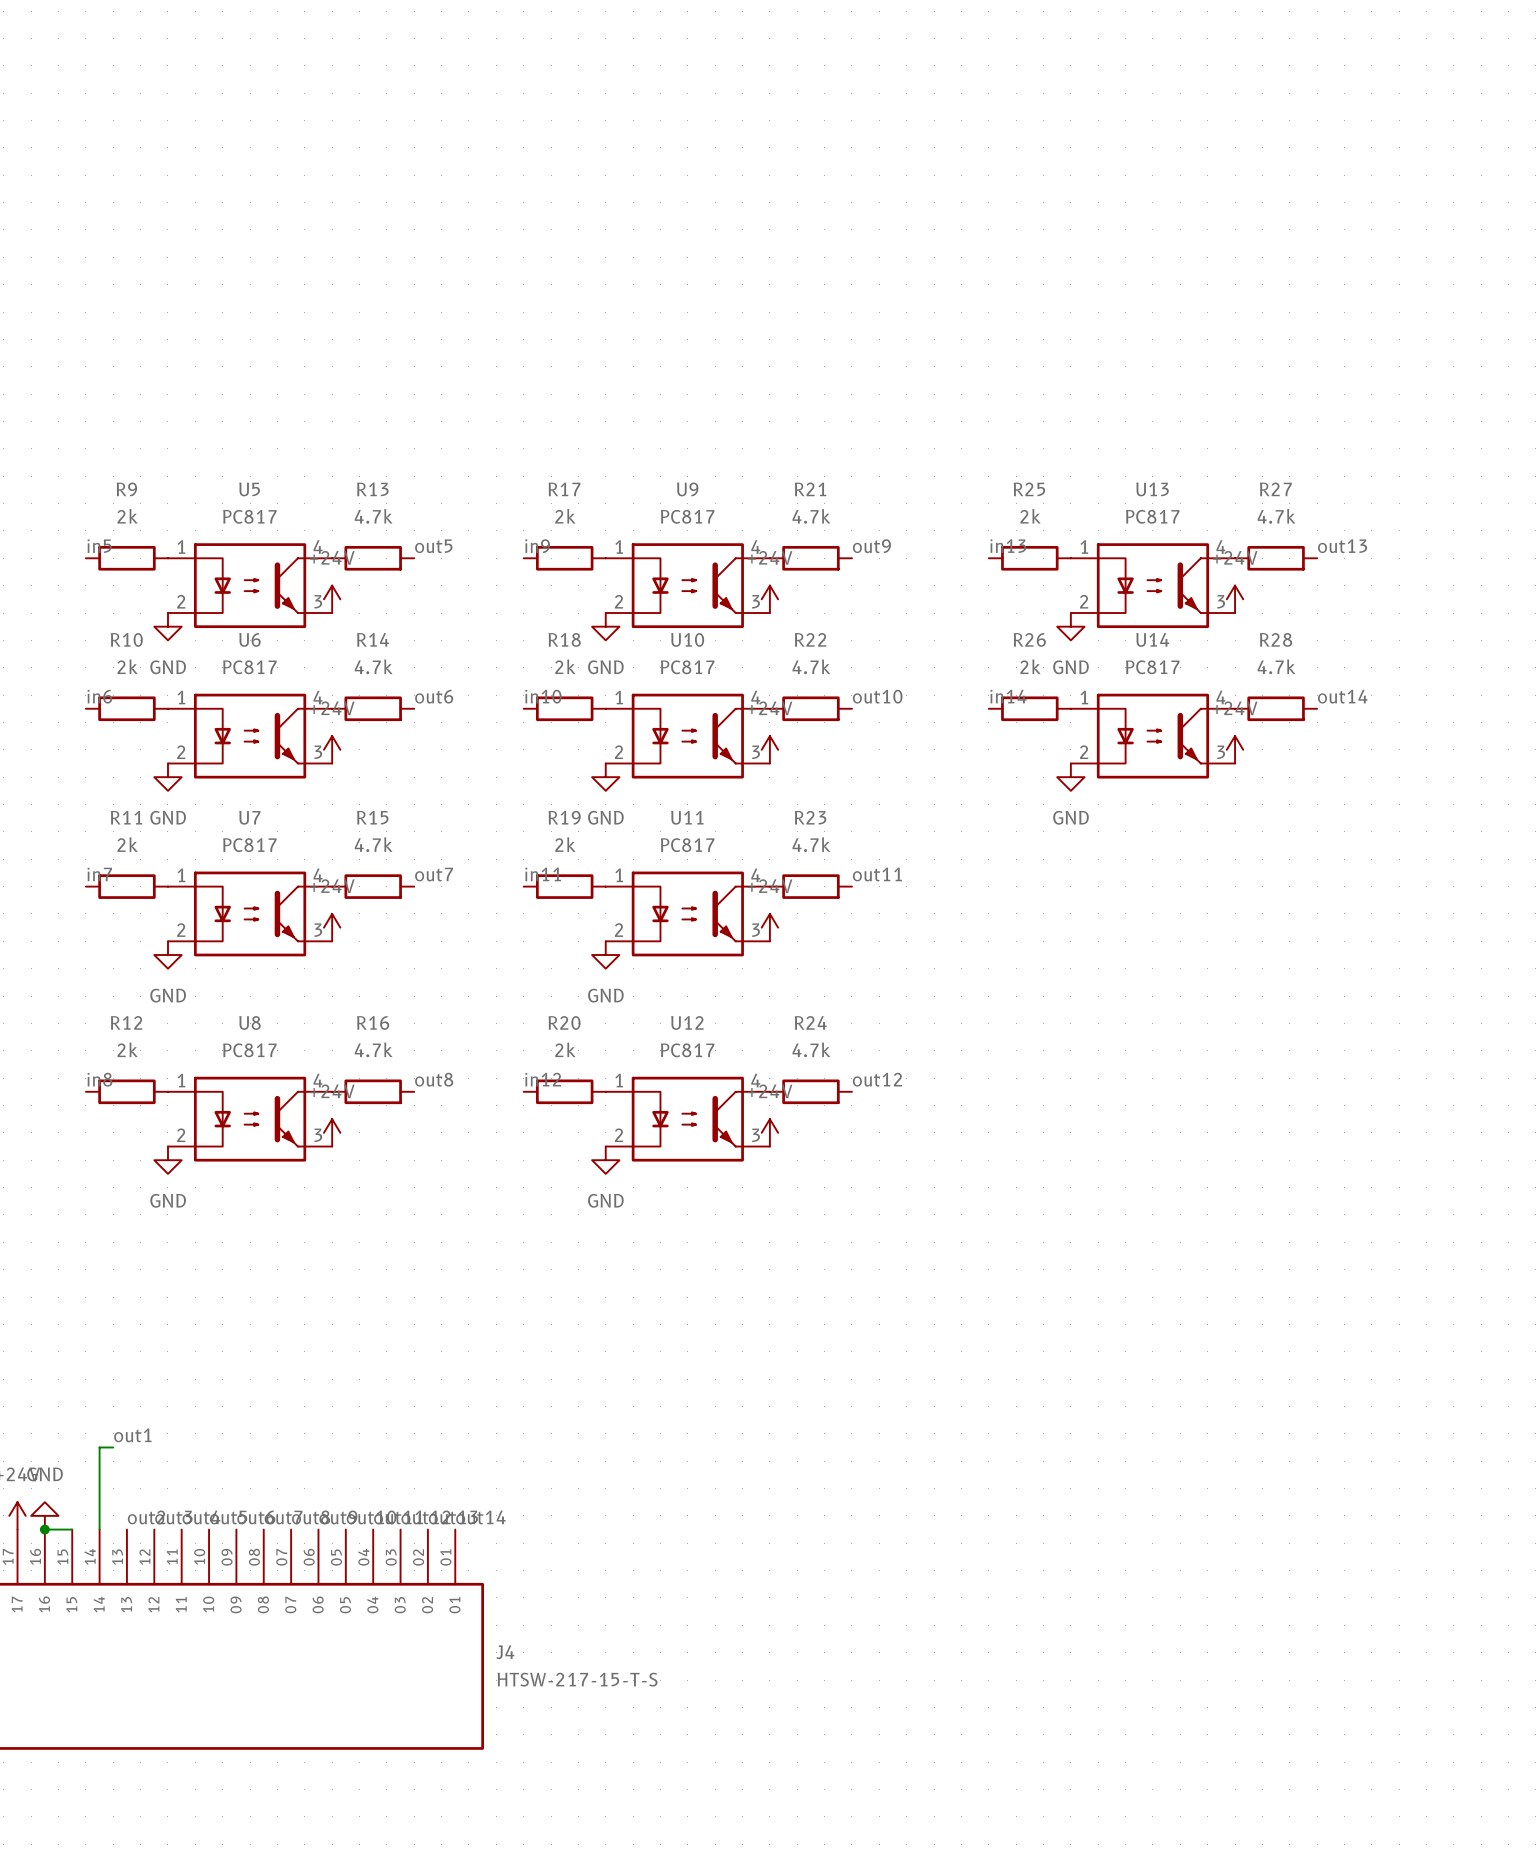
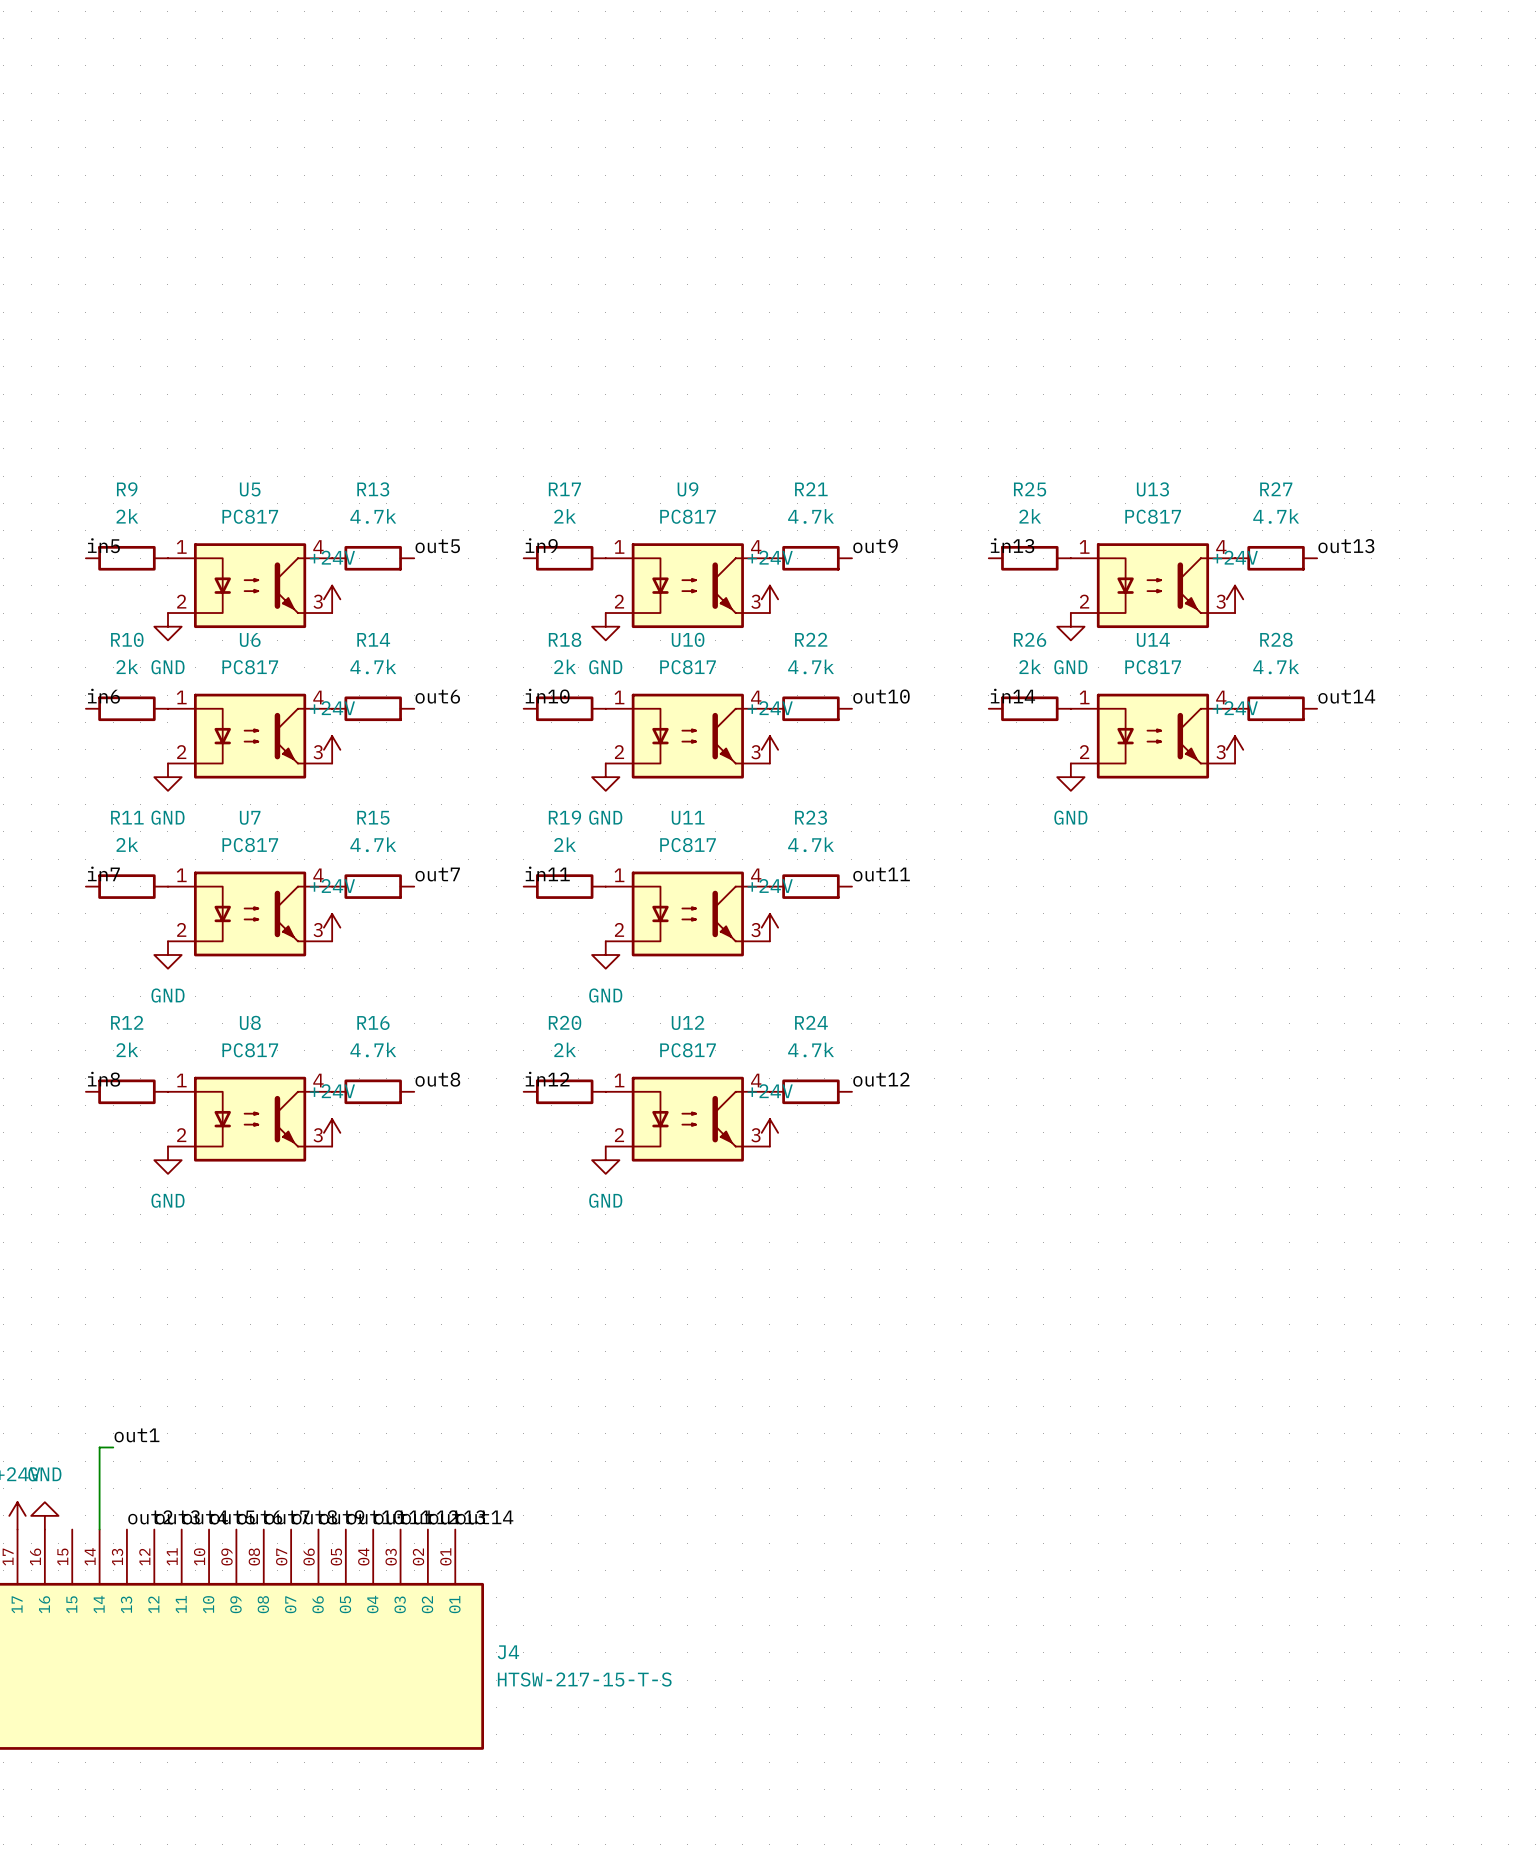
wire: (44, 1529) (72, 1529) -> none
junction: (44, 1529) -> none

